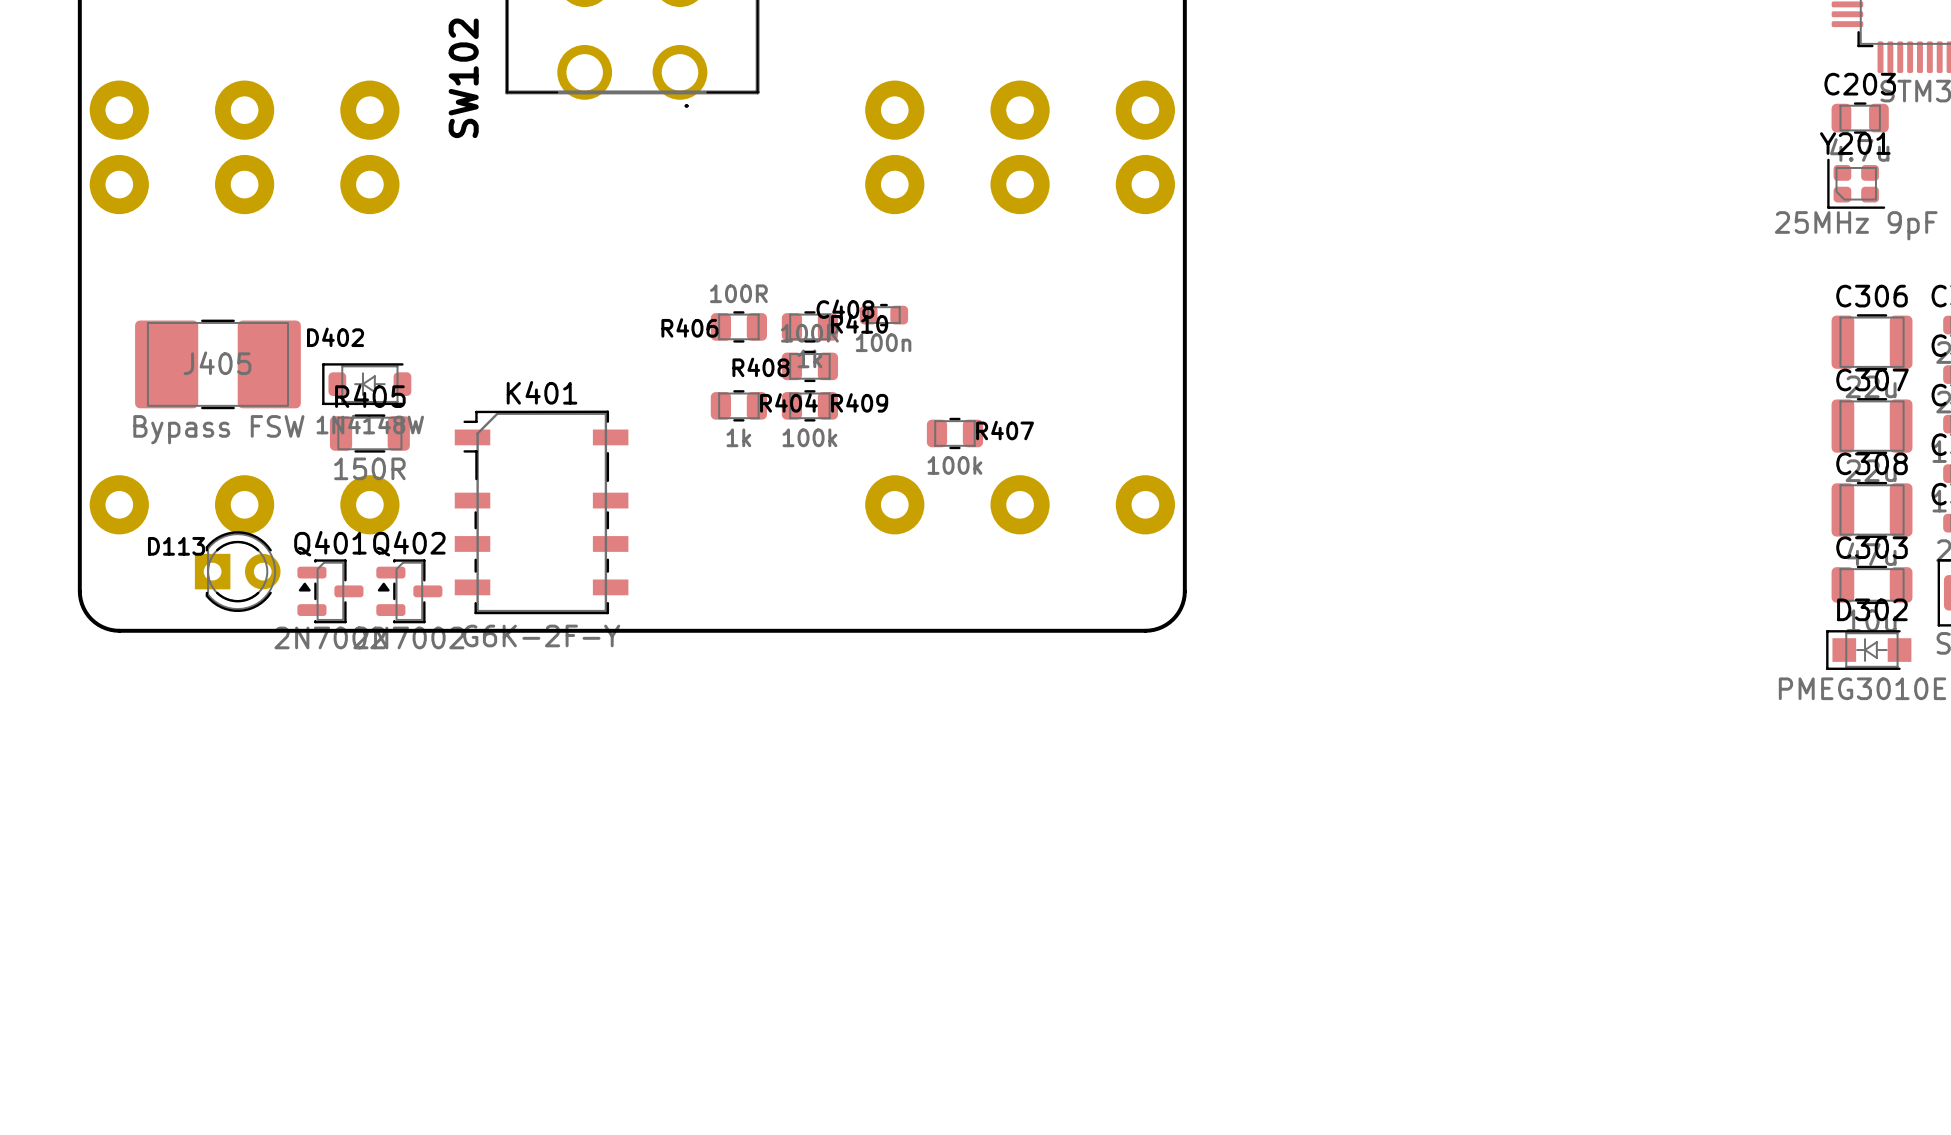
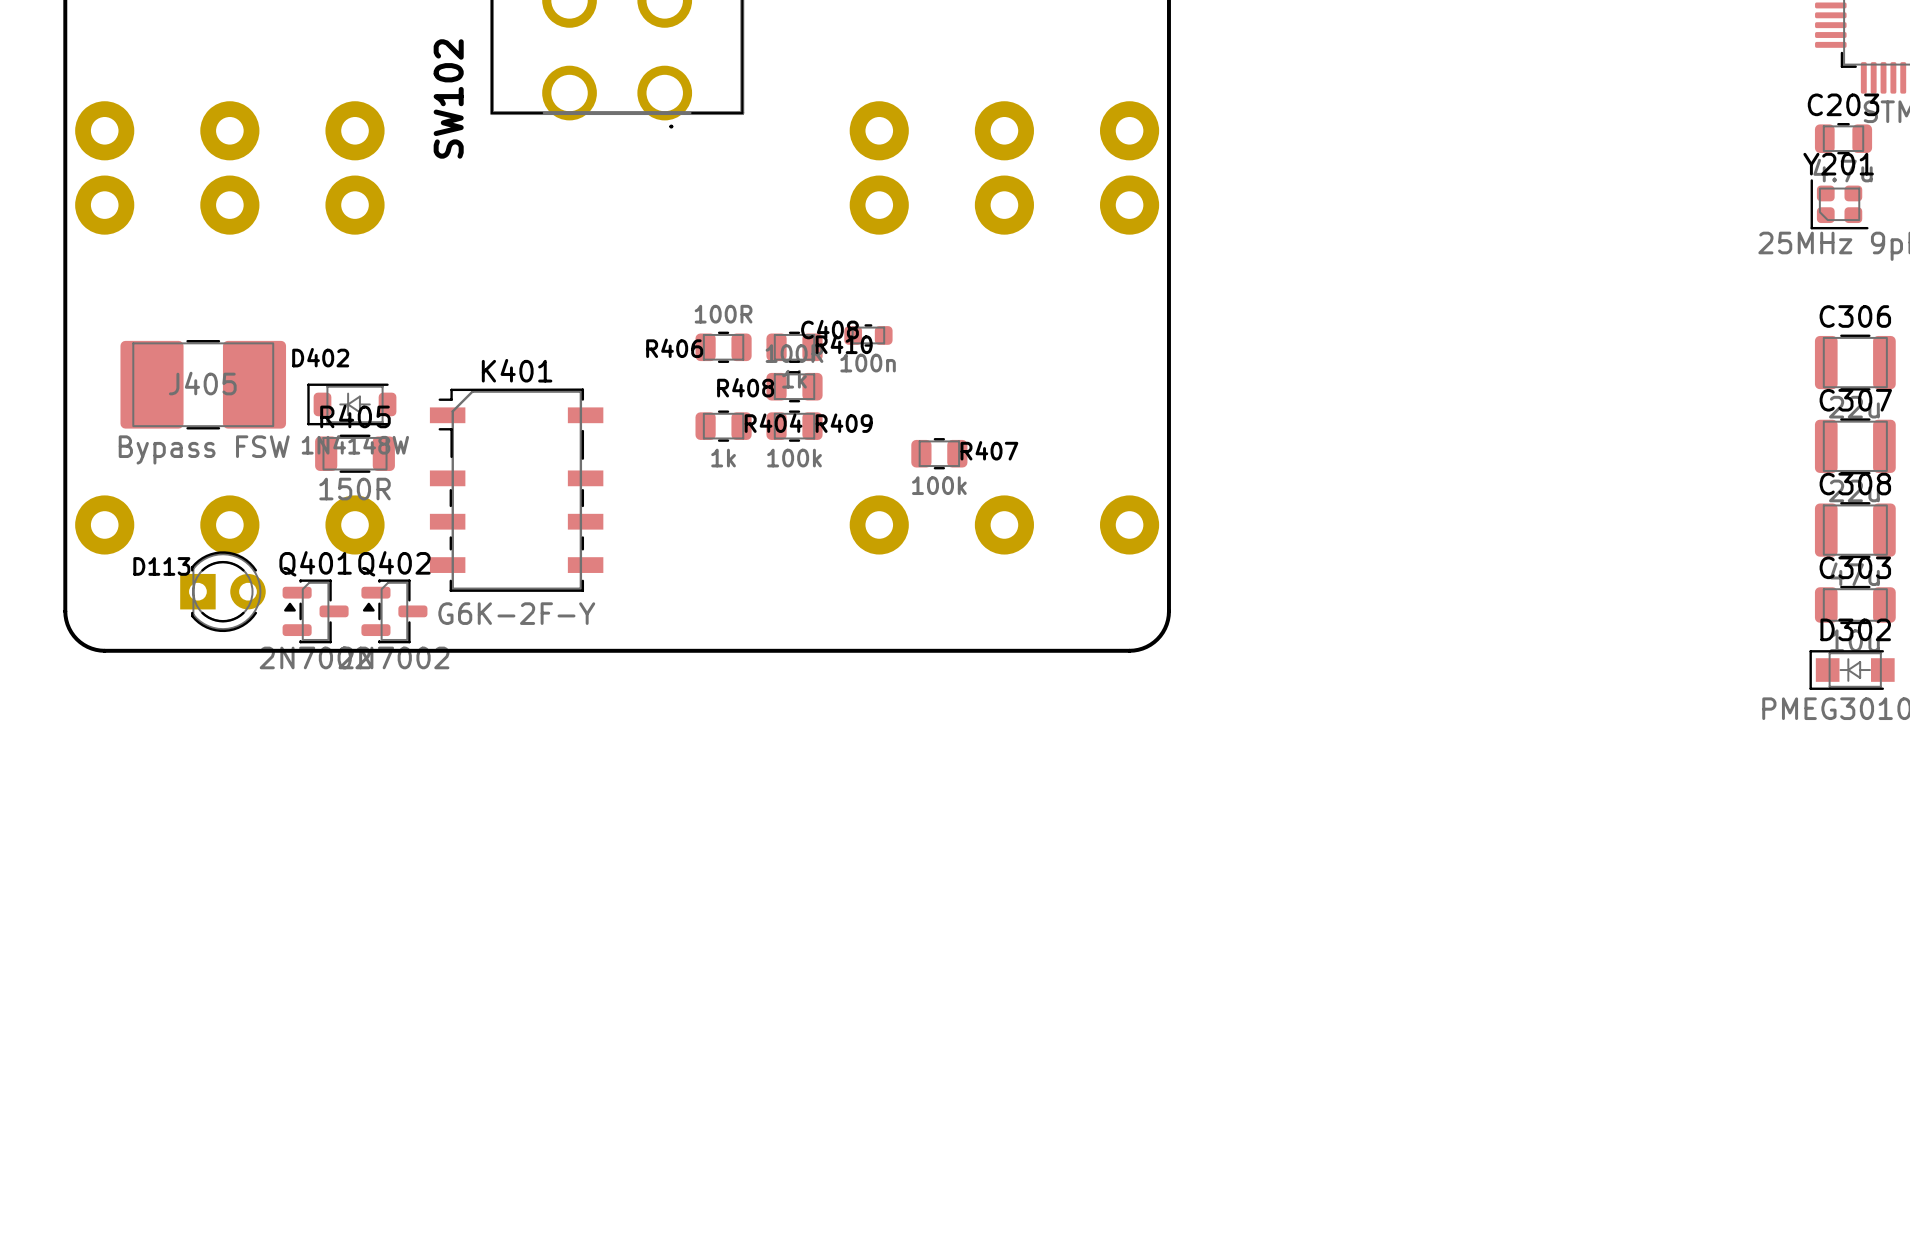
K401 position: (541, 512) -> (516, 490)

